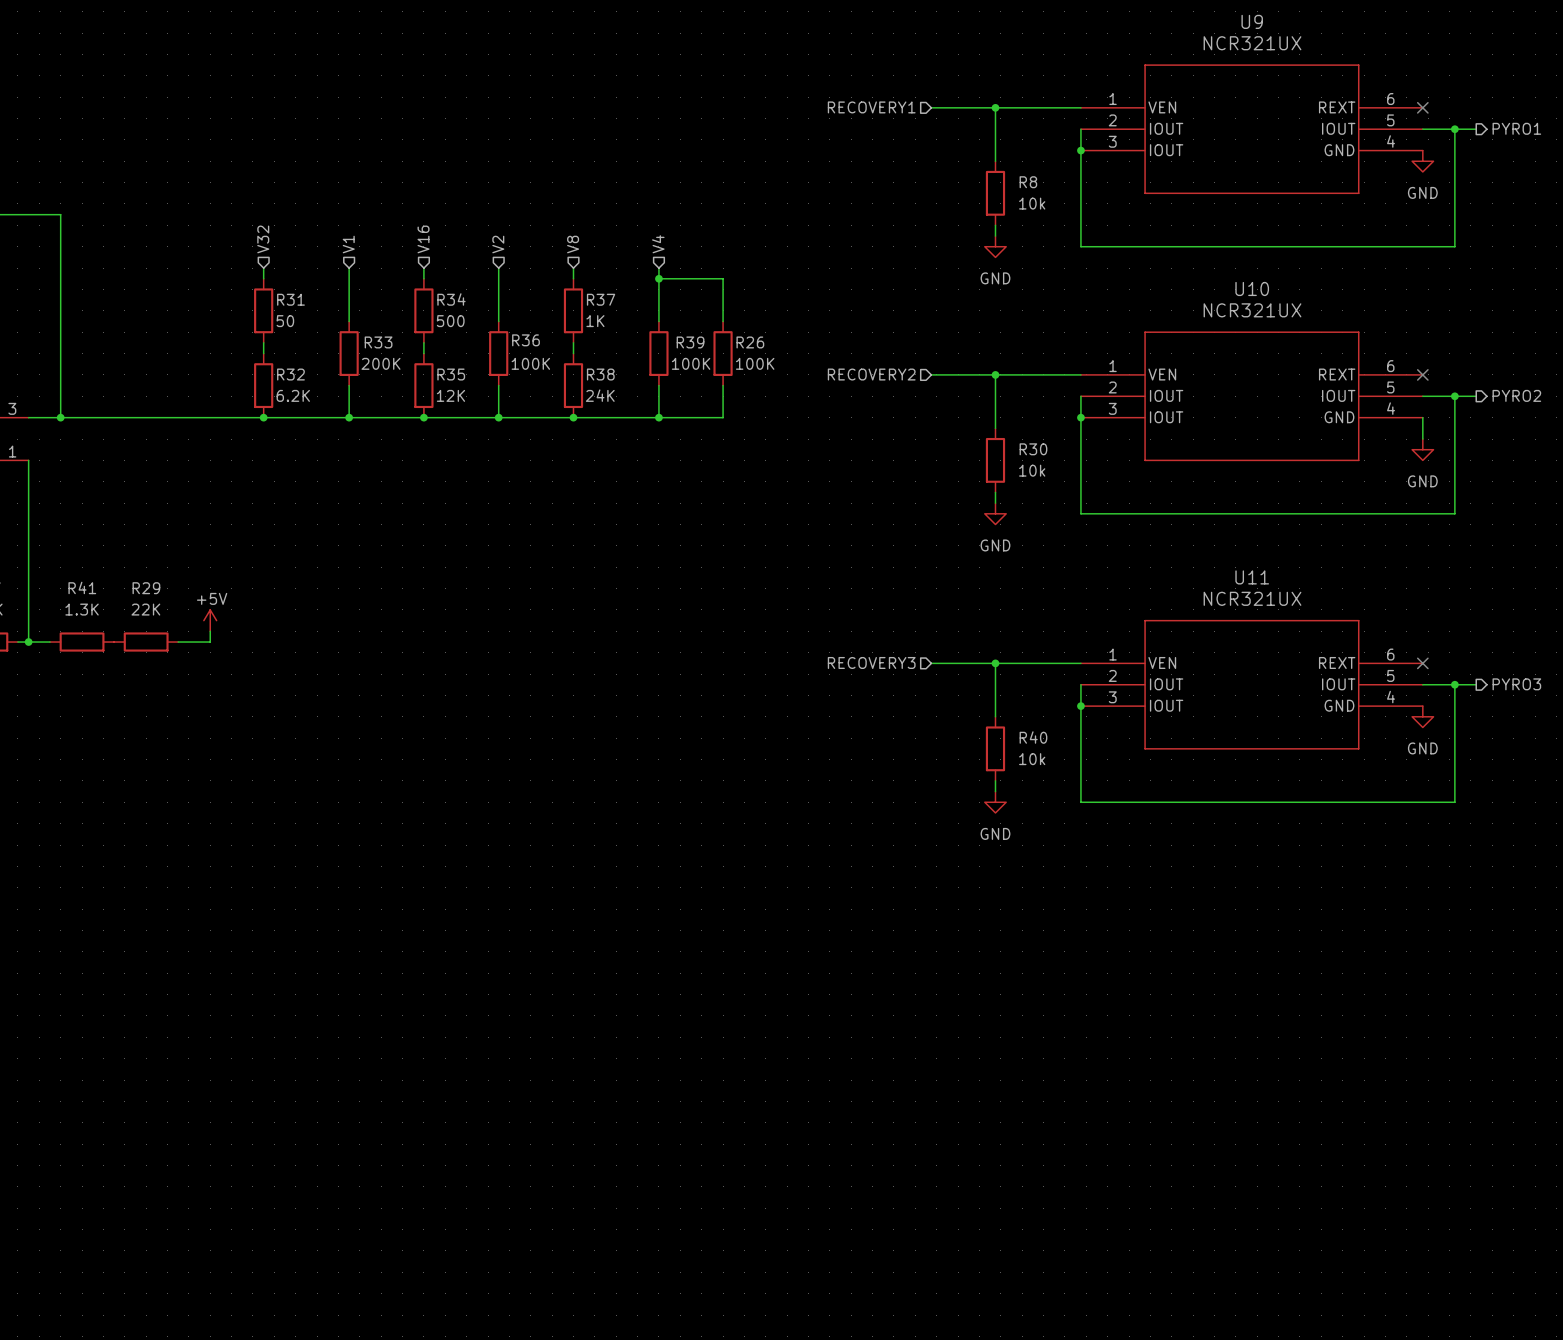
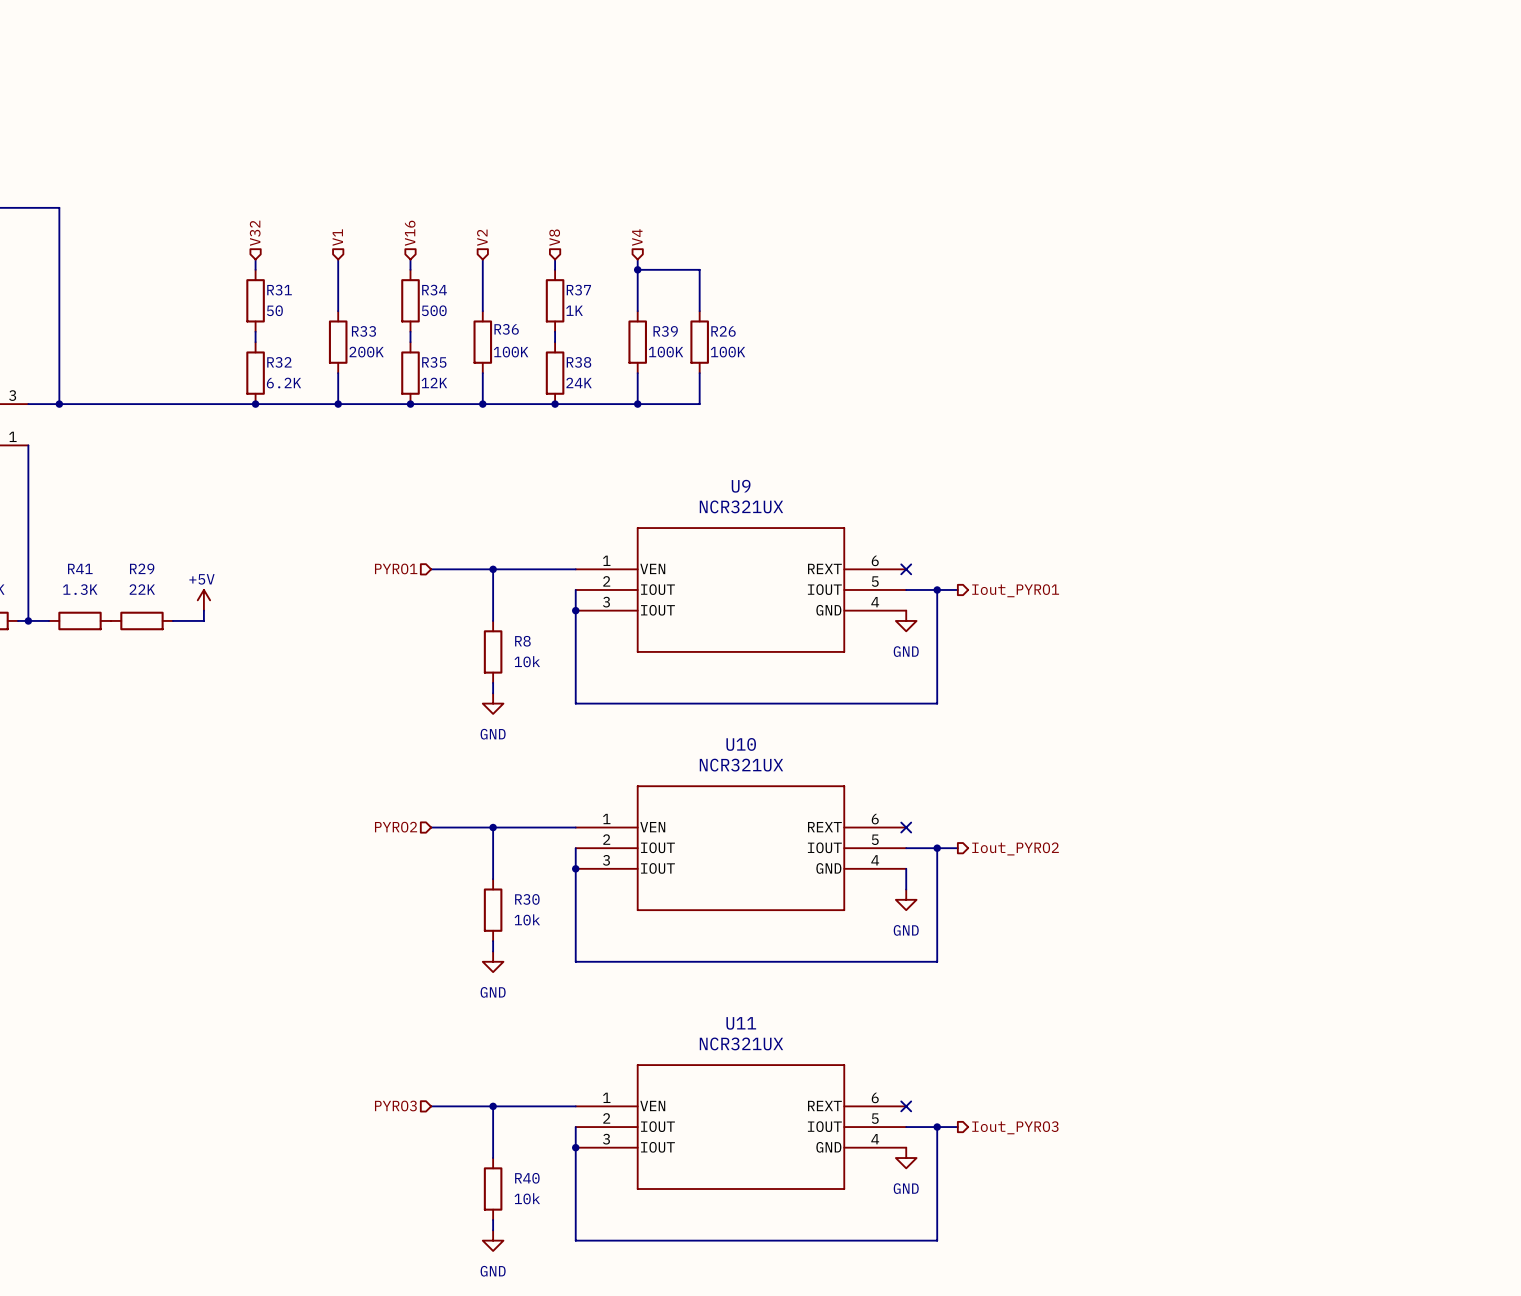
hierarchical label: RECOVERY1 (871, 107) -> none
wire: (931, 107) (1080, 107) -> none
wire: (995, 107) (995, 161) -> none
junction: (995, 107) -> none
no-connect mark: (1422, 107) -> none
hierarchical label: PYRO1 (1516, 128) -> none
wire: (1080, 129) (1080, 246) (1454, 246) (1454, 129) -> none
U9 position: (1251, 129) -> (740, 589)
wire: (1422, 129) (1476, 129) -> none
junction: (1454, 129) -> none
junction: (1080, 150) -> none
power symbol: GND (1422, 161) -> none
R8 position: (995, 193) -> (493, 651)
wire: (995, 225) (995, 236) -> none
power symbol: GND (995, 246) -> none
hierarchical label: RECOVERY2 (871, 374) -> none
wire: (931, 374) (1080, 374) -> none
wire: (995, 374) (995, 428) -> none
junction: (995, 374) -> none
no-connect mark: (1422, 374) -> none
hierarchical label: PYRO2 (1516, 395) -> none
wire: (1080, 396) (1080, 513) (1454, 513) (1454, 396) -> none
U10 position: (1251, 396) -> (740, 848)
wire: (1422, 396) (1476, 396) -> none
junction: (1454, 396) -> none
junction: (1080, 417) -> none
wire: (1422, 417) (1422, 439) -> none
power symbol: GND (1422, 449) -> none
R30 position: (995, 460) -> (493, 910)
wire: (995, 492) (995, 503) -> none
power symbol: GND (995, 513) -> none
hierarchical label: none -> PYRO1 (396, 568)
wire: none -> (431, 569) (575, 569)
wire: none -> (493, 569) (493, 620)
junction: none -> (493, 569)
no-connect mark: none -> (906, 569)
wire: none -> (575, 589) (575, 703) (937, 703) (937, 589)
wire: none -> (906, 589) (957, 589)
junction: none -> (937, 589)
hierarchical label: none -> Iout_PYRO1 (1015, 590)
junction: none -> (575, 610)
power symbol: none -> GND (906, 620)
hierarchical label: RECOVERY3 (871, 662) -> none
wire: (931, 663) (1080, 663) -> none
wire: (995, 663) (995, 716) -> none
junction: (995, 663) -> none
no-connect mark: (1422, 663) -> none
wire: (1080, 684) (1080, 802) (1454, 802) (1454, 684) -> none
U11 position: (1251, 684) -> (740, 1127)
wire: (1422, 684) (1476, 684) -> none
junction: (1454, 684) -> none
hierarchical label: PYRO3 (1516, 684) -> none
wire: none -> (493, 682) (493, 693)
junction: (1080, 706) -> none
power symbol: GND (1422, 716) -> none
power symbol: none -> GND (493, 703)
R40 position: (995, 748) -> (493, 1189)
wire: (995, 780) (995, 791) -> none
power symbol: GND (995, 802) -> none
hierarchical label: none -> PYRO2 (396, 827)
wire: none -> (431, 827) (575, 827)
wire: none -> (493, 827) (493, 879)
junction: none -> (493, 827)
no-connect mark: none -> (906, 827)
wire: none -> (575, 848) (575, 961) (937, 961) (937, 848)
wire: none -> (906, 848) (957, 848)
junction: none -> (937, 848)
hierarchical label: none -> Iout_PYRO2 (1015, 848)
junction: none -> (575, 868)
wire: none -> (906, 868) (906, 889)
power symbol: none -> GND (906, 899)
wire: none -> (493, 941) (493, 951)
power symbol: none -> GND (493, 961)
hierarchical label: none -> PYRO3 (395, 1105)
wire: none -> (431, 1106) (575, 1106)
wire: none -> (493, 1106) (493, 1158)
junction: none -> (493, 1106)
no-connect mark: none -> (906, 1106)
wire: none -> (575, 1127) (575, 1240) (937, 1240) (937, 1127)
wire: none -> (906, 1127) (957, 1127)
junction: none -> (937, 1127)
hierarchical label: none -> Iout_PYRO3 (1015, 1127)
junction: none -> (575, 1147)
power symbol: none -> GND (906, 1158)
wire: none -> (493, 1219) (493, 1230)
power symbol: none -> GND (493, 1240)

